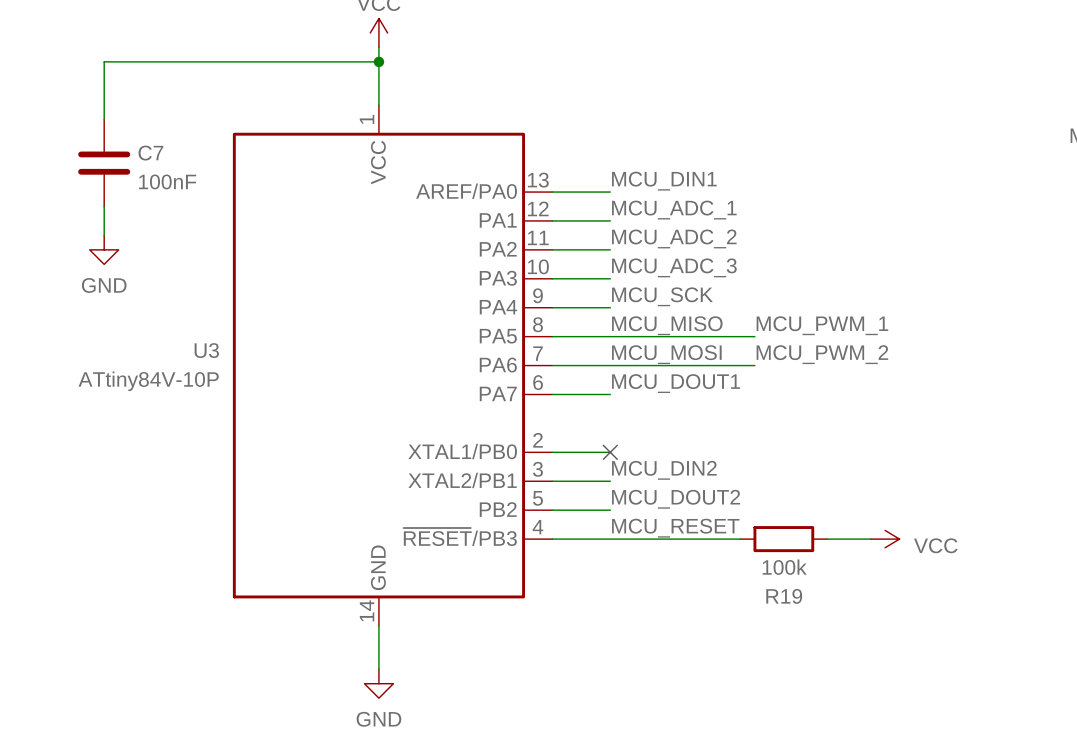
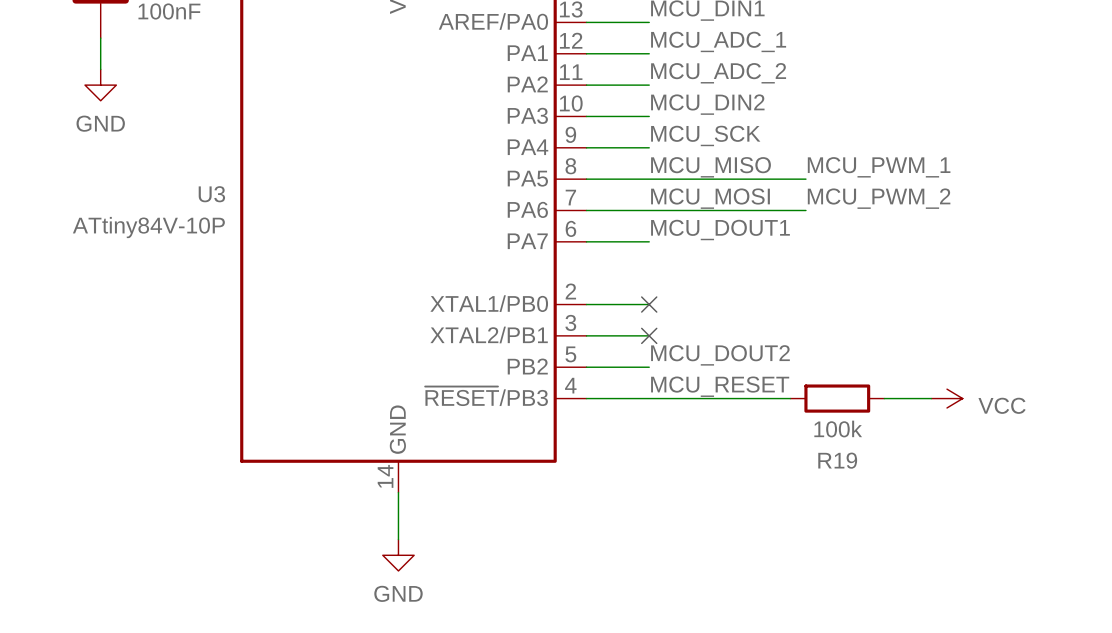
label: MCU_ADC_3 (674, 267) -> MCU_DIN2 (707, 104)
label: MCU_DIN2 (664, 470) -> none
no-connect mark: none -> (649, 335)

